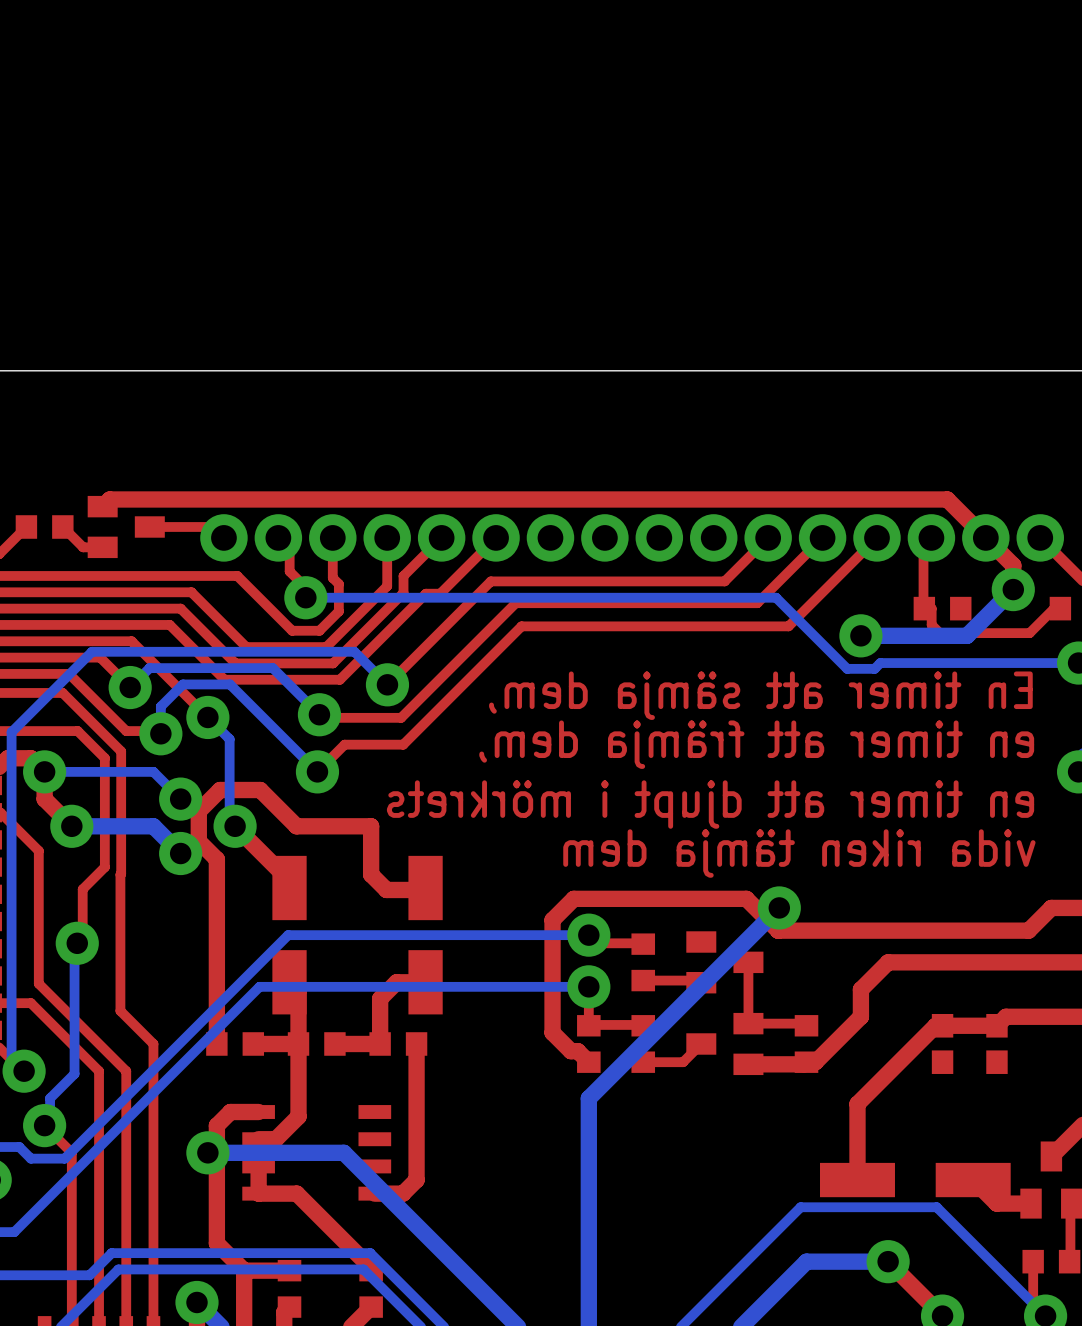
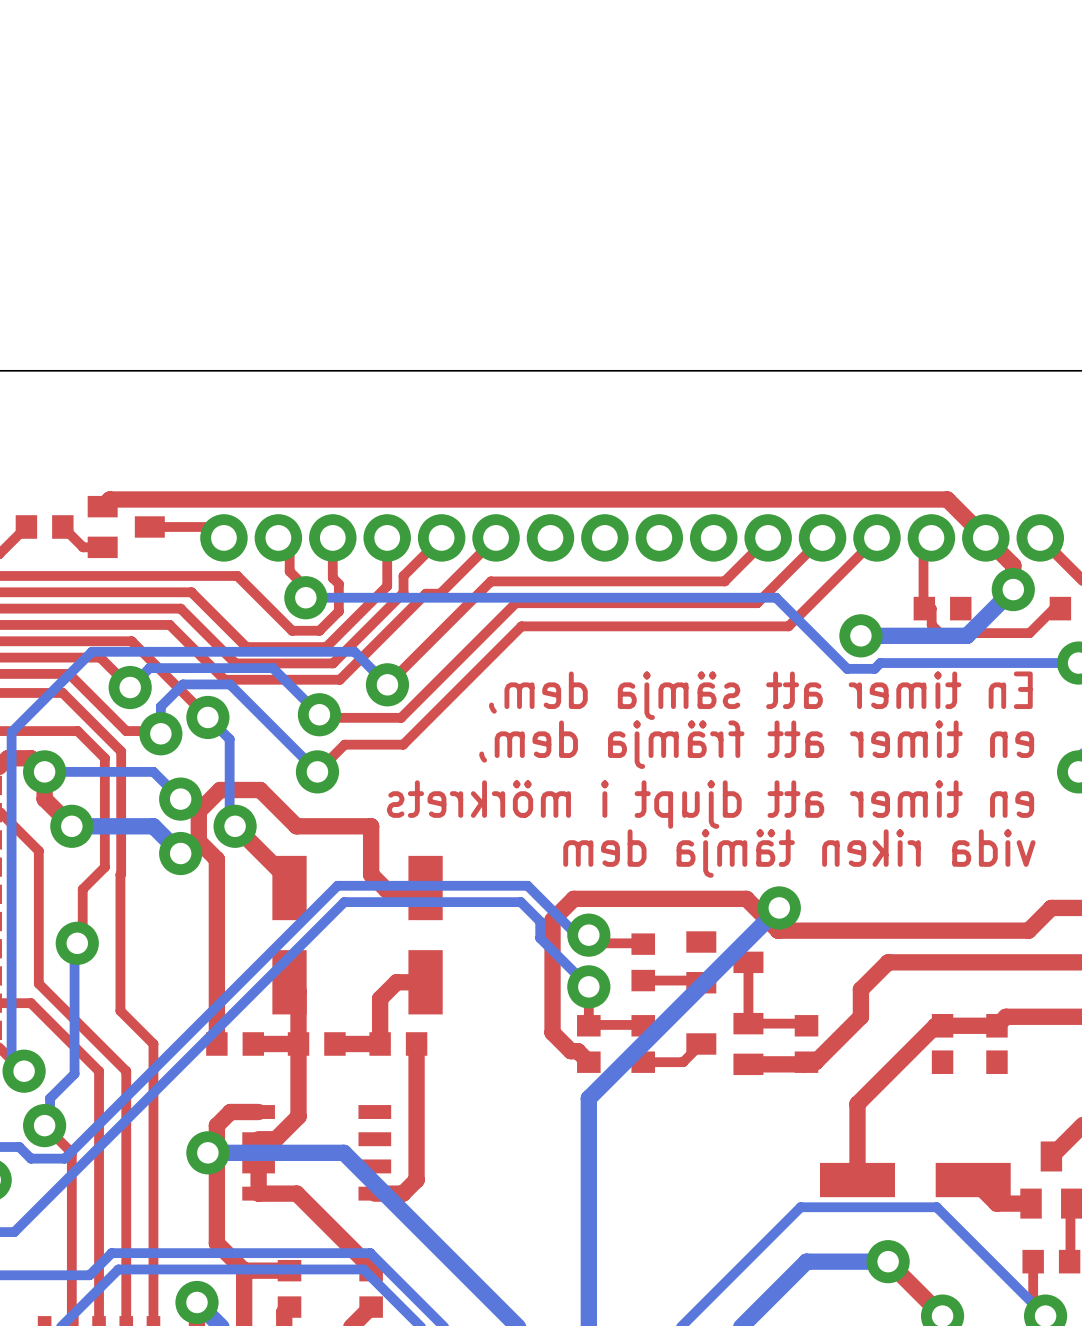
bottom track: (576, 935) (288, 935) -> (576, 935) (527, 885) (337, 885) (288, 935)
bottom track: (588, 986) (259, 986) -> (588, 986) (540, 938) (540, 921) (520, 902) (344, 902) (259, 986)

